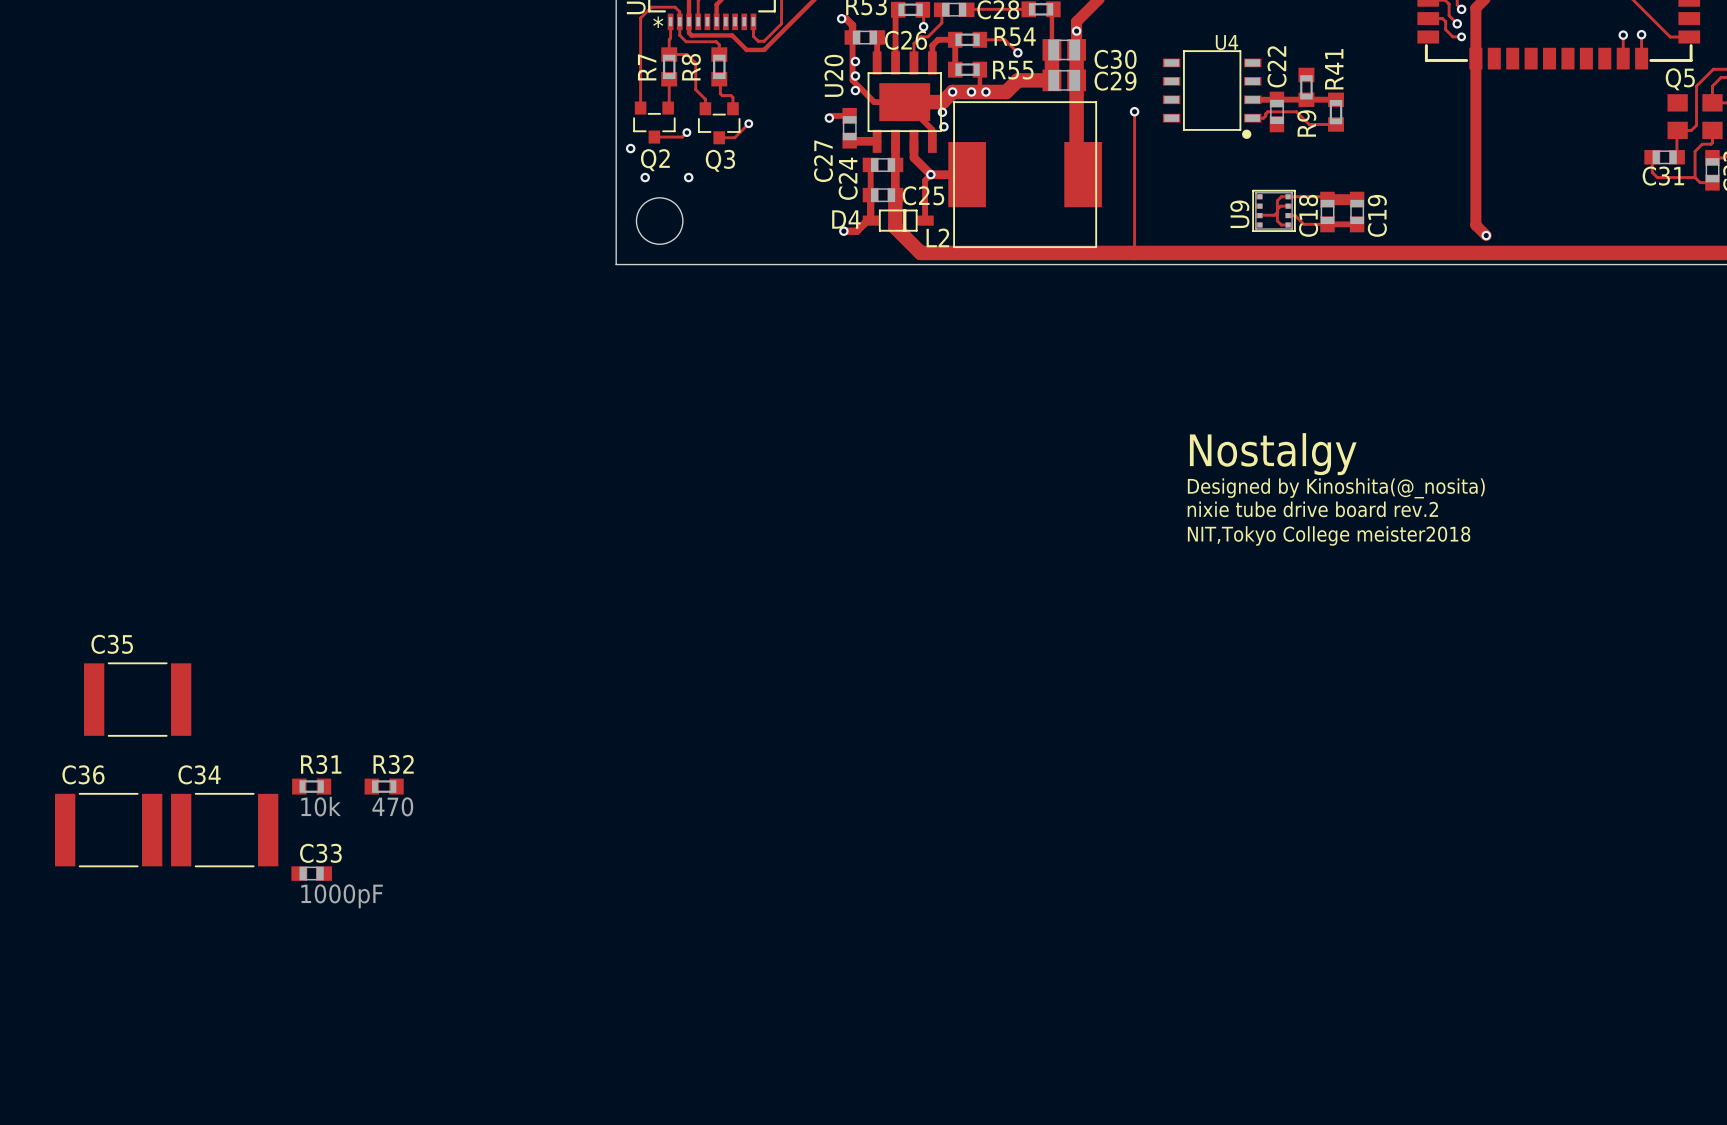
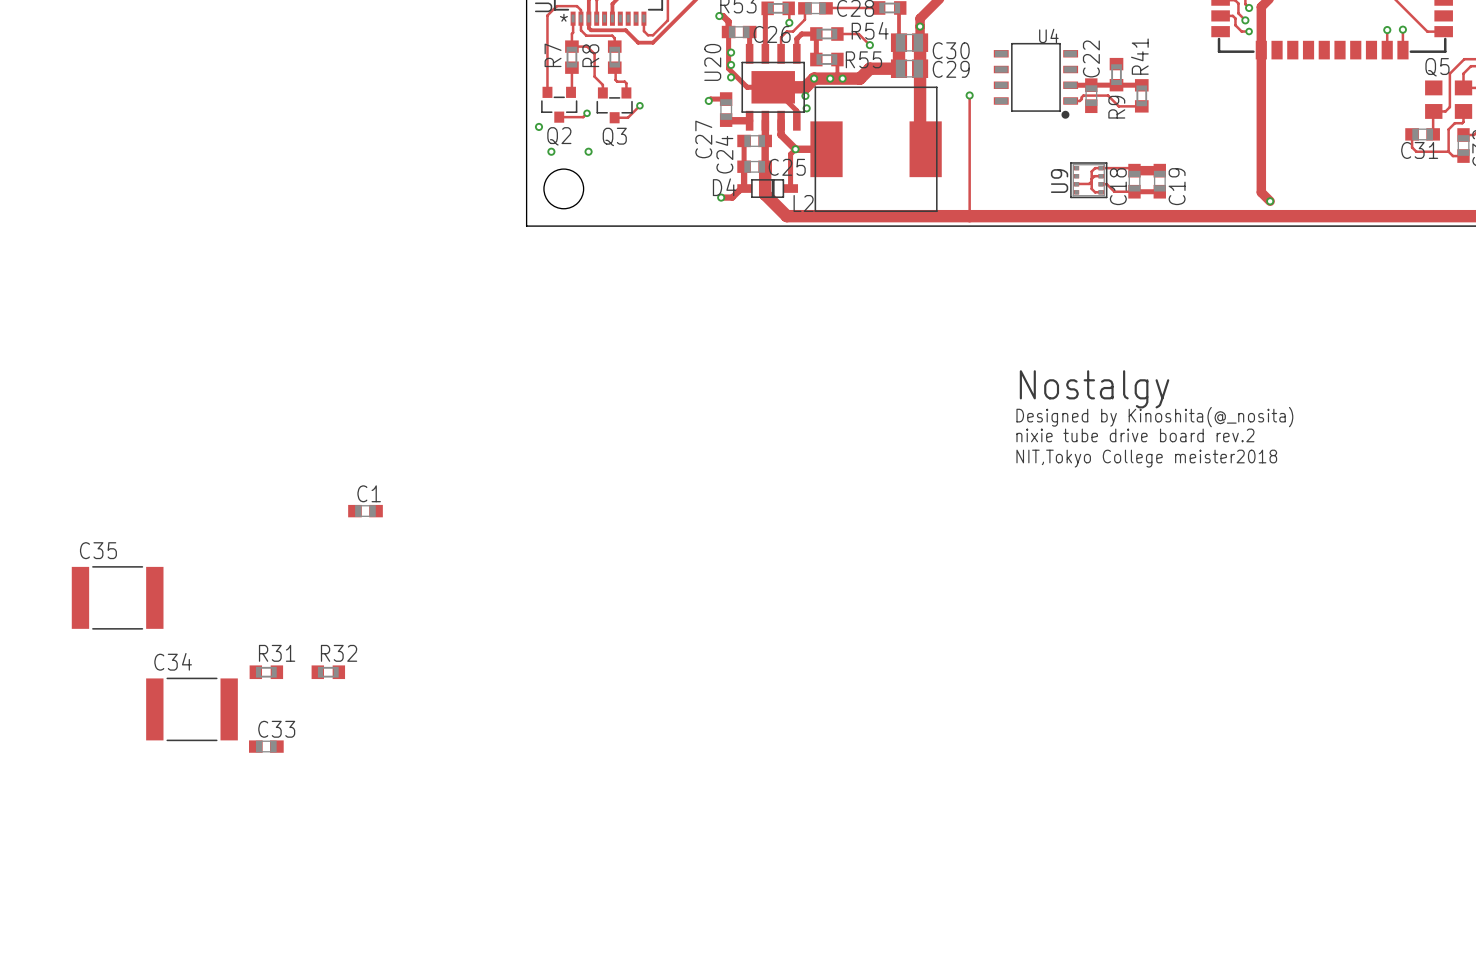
C1: none -> (365, 511)
R31 value: 10k (321, 806) -> none
R32 value: 470 (392, 806) -> none
C36: (108, 830) -> none
C33 value: 1000pF (342, 896) -> none

